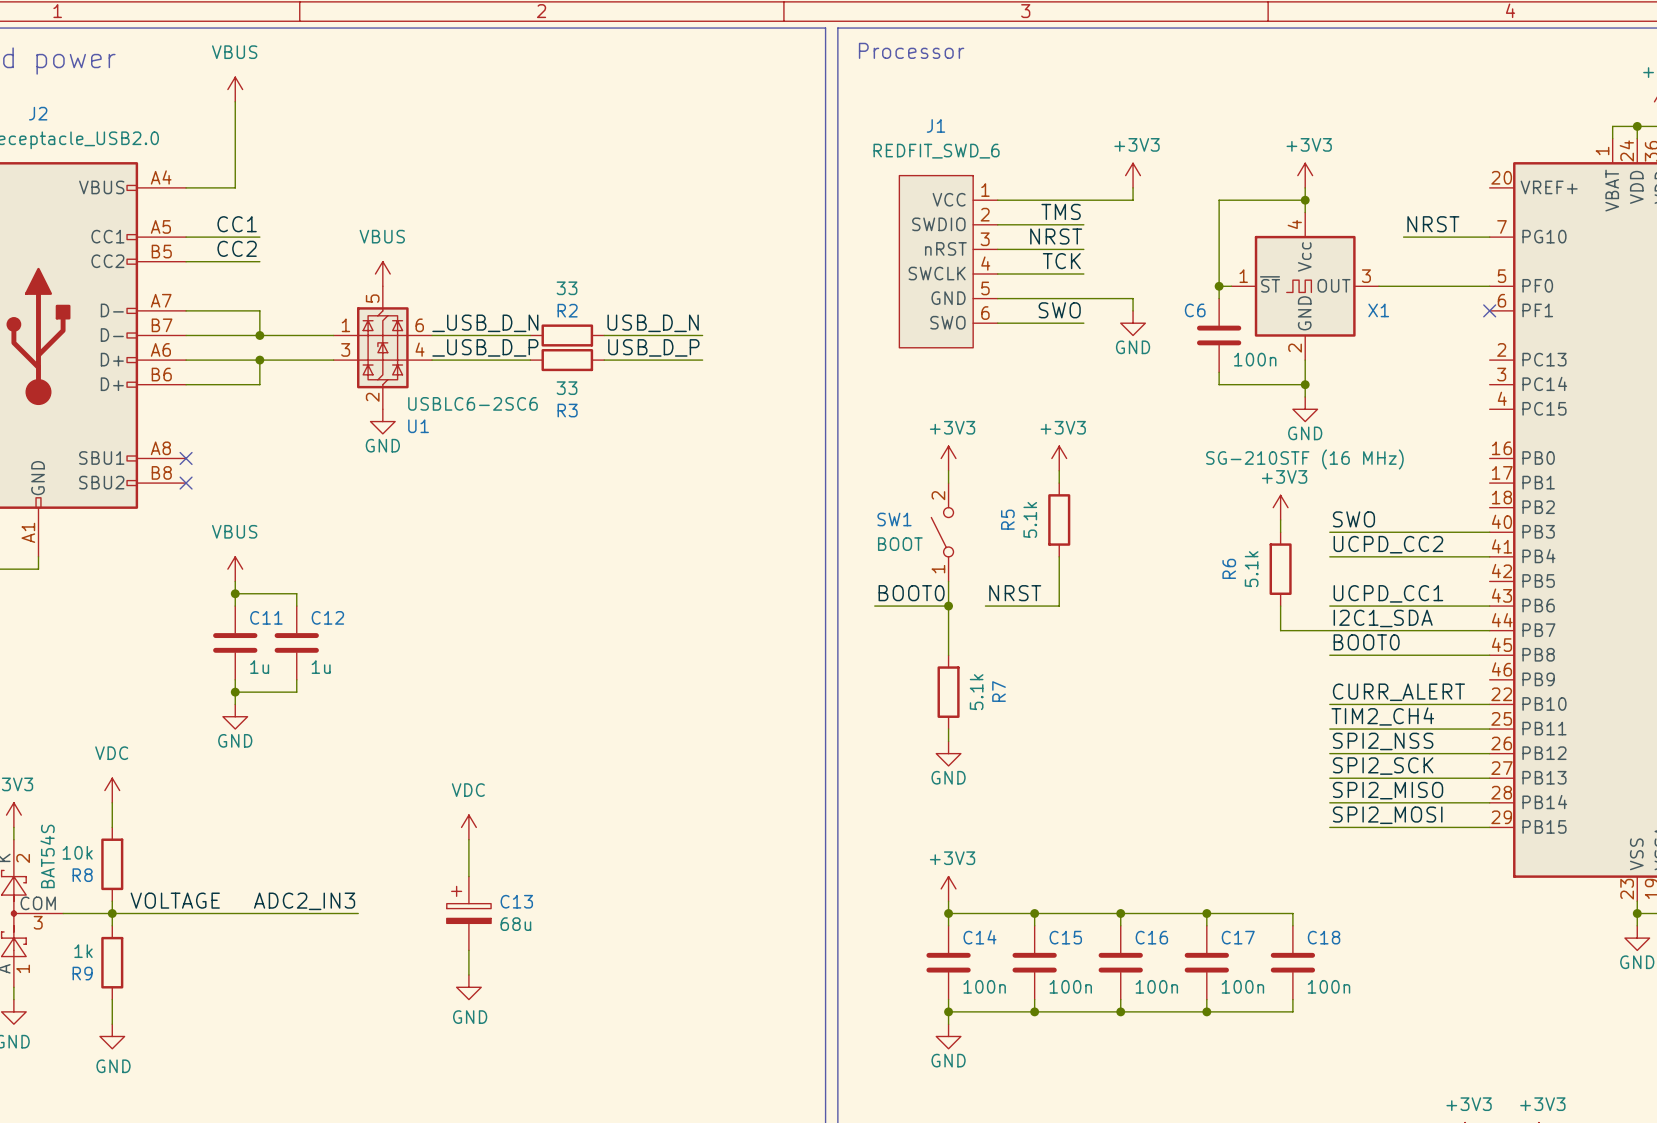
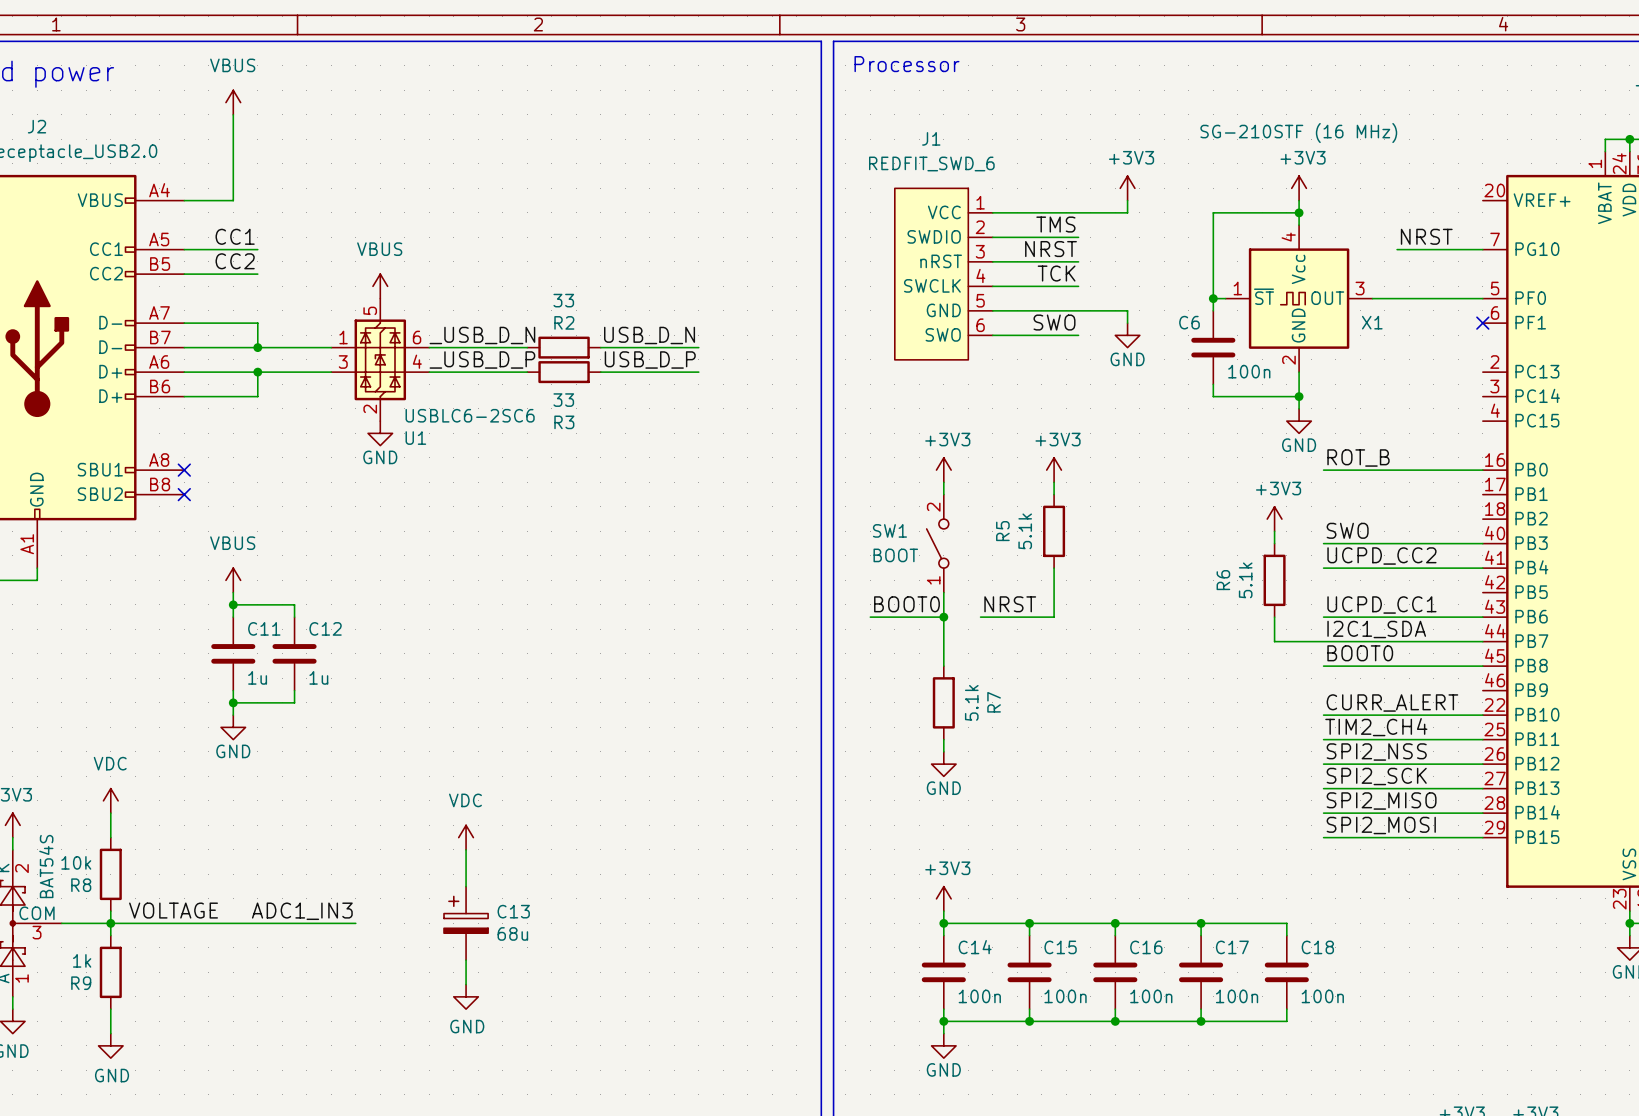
label: none -> ROT_B (1358, 457)
wire: none -> (1323, 470) (1482, 470)
X1 value position: SG-210STF (16 MHz) (1304, 459) -> SG-210STF (16 MHz) (1298, 133)
label: ADC2_IN3 (304, 901) -> ADC1_IN3 (302, 911)

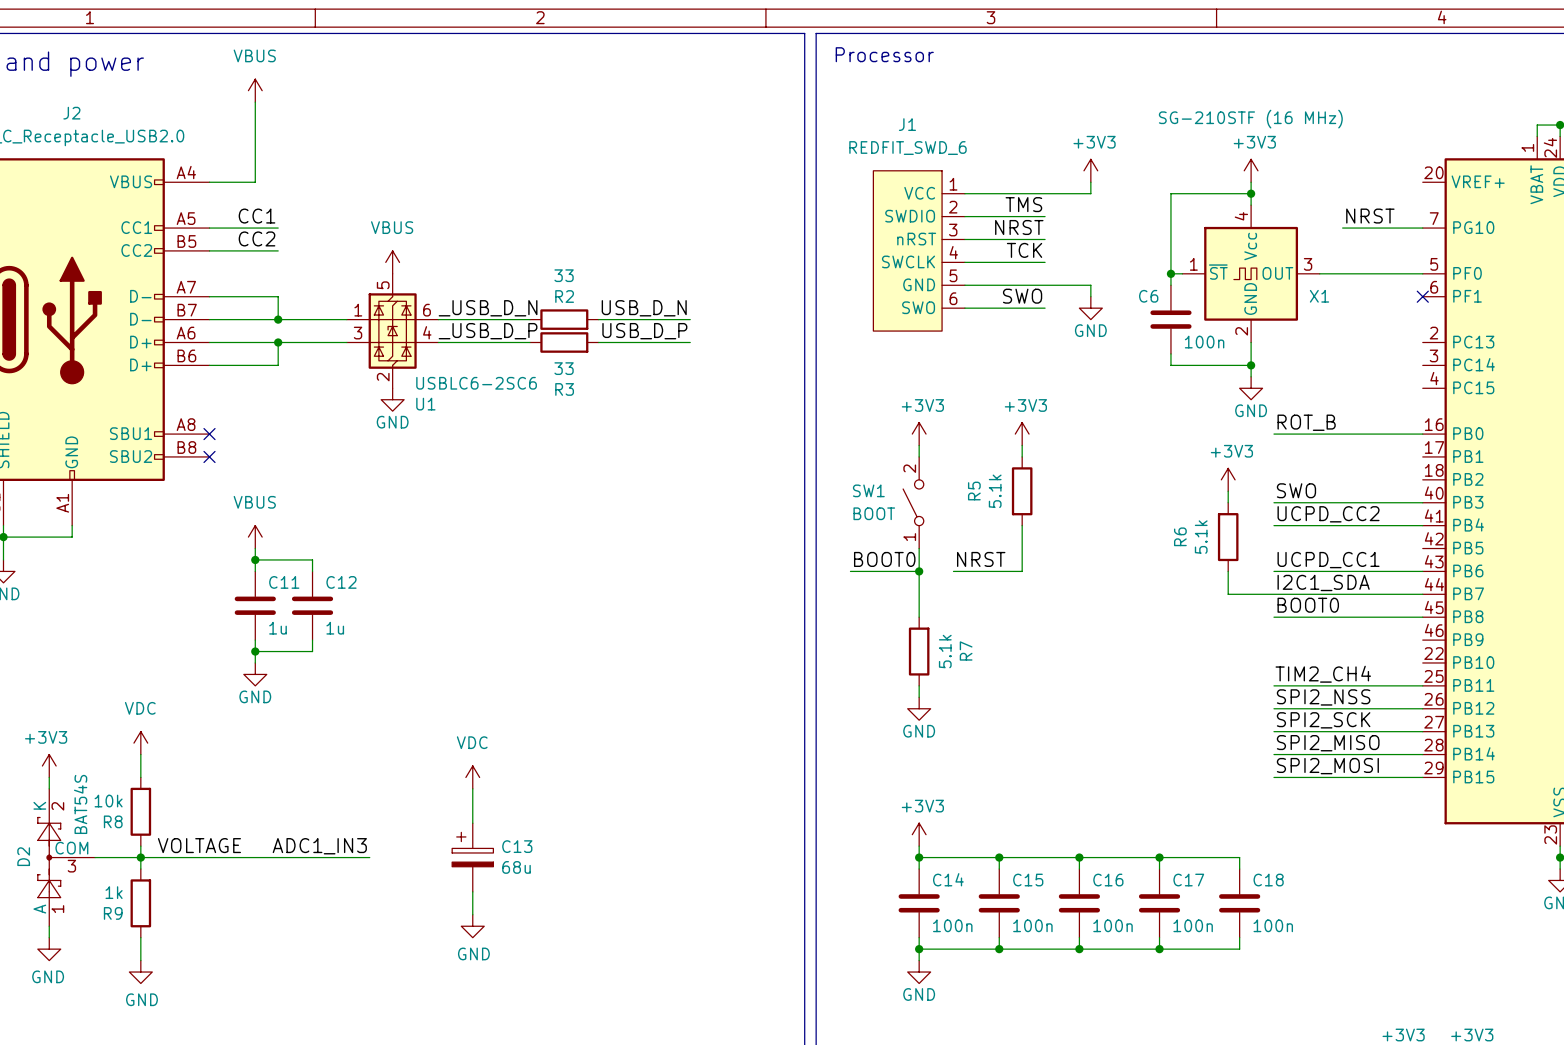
label: CURR_ALERT (1392, 703) -> none
wire: (1323, 715) (1482, 715) -> none

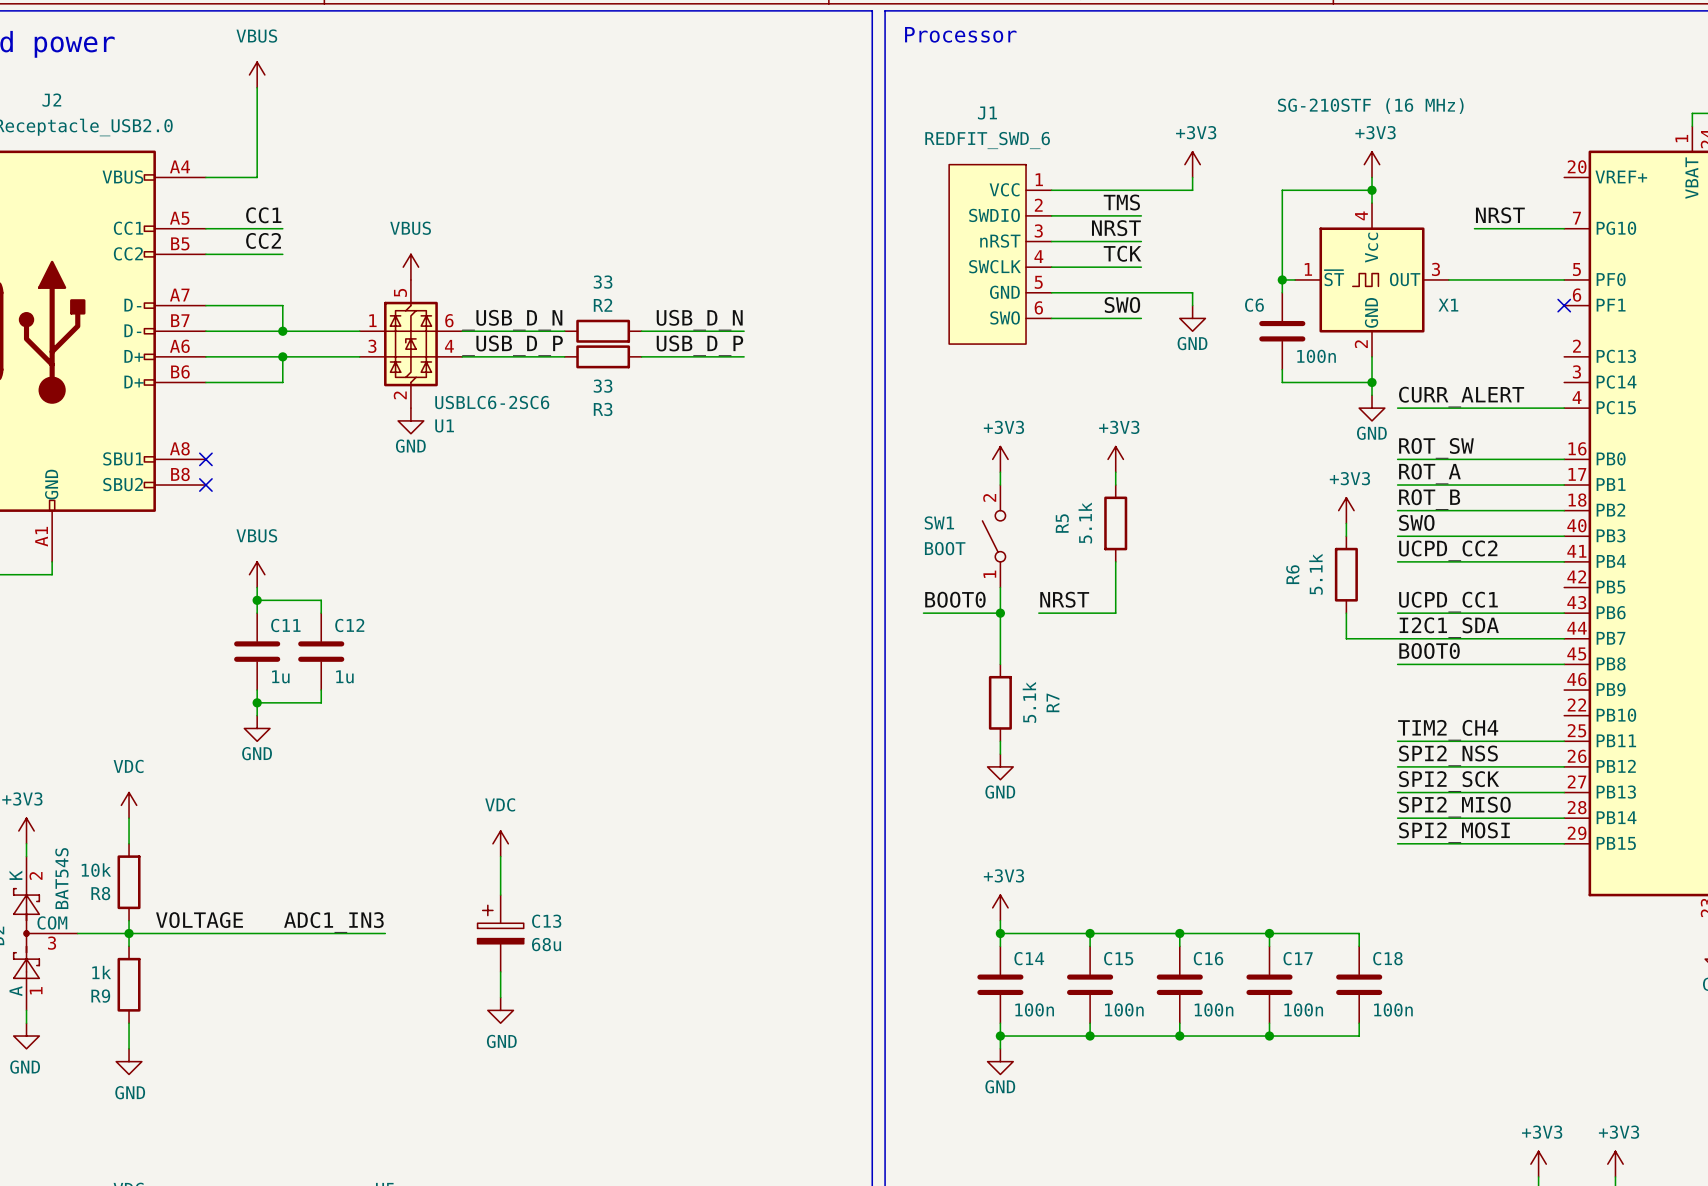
label: none -> CURR_ALERT (1461, 397)
wire: none -> (1397, 408) (1564, 408)
label: ROT_B (1306, 422) -> ROT_SW (1436, 448)
label: none -> ROT_A (1429, 473)
wire: none -> (1397, 485) (1564, 485)
label: none -> ROT_B (1429, 499)
wire: none -> (1397, 510) (1564, 510)

